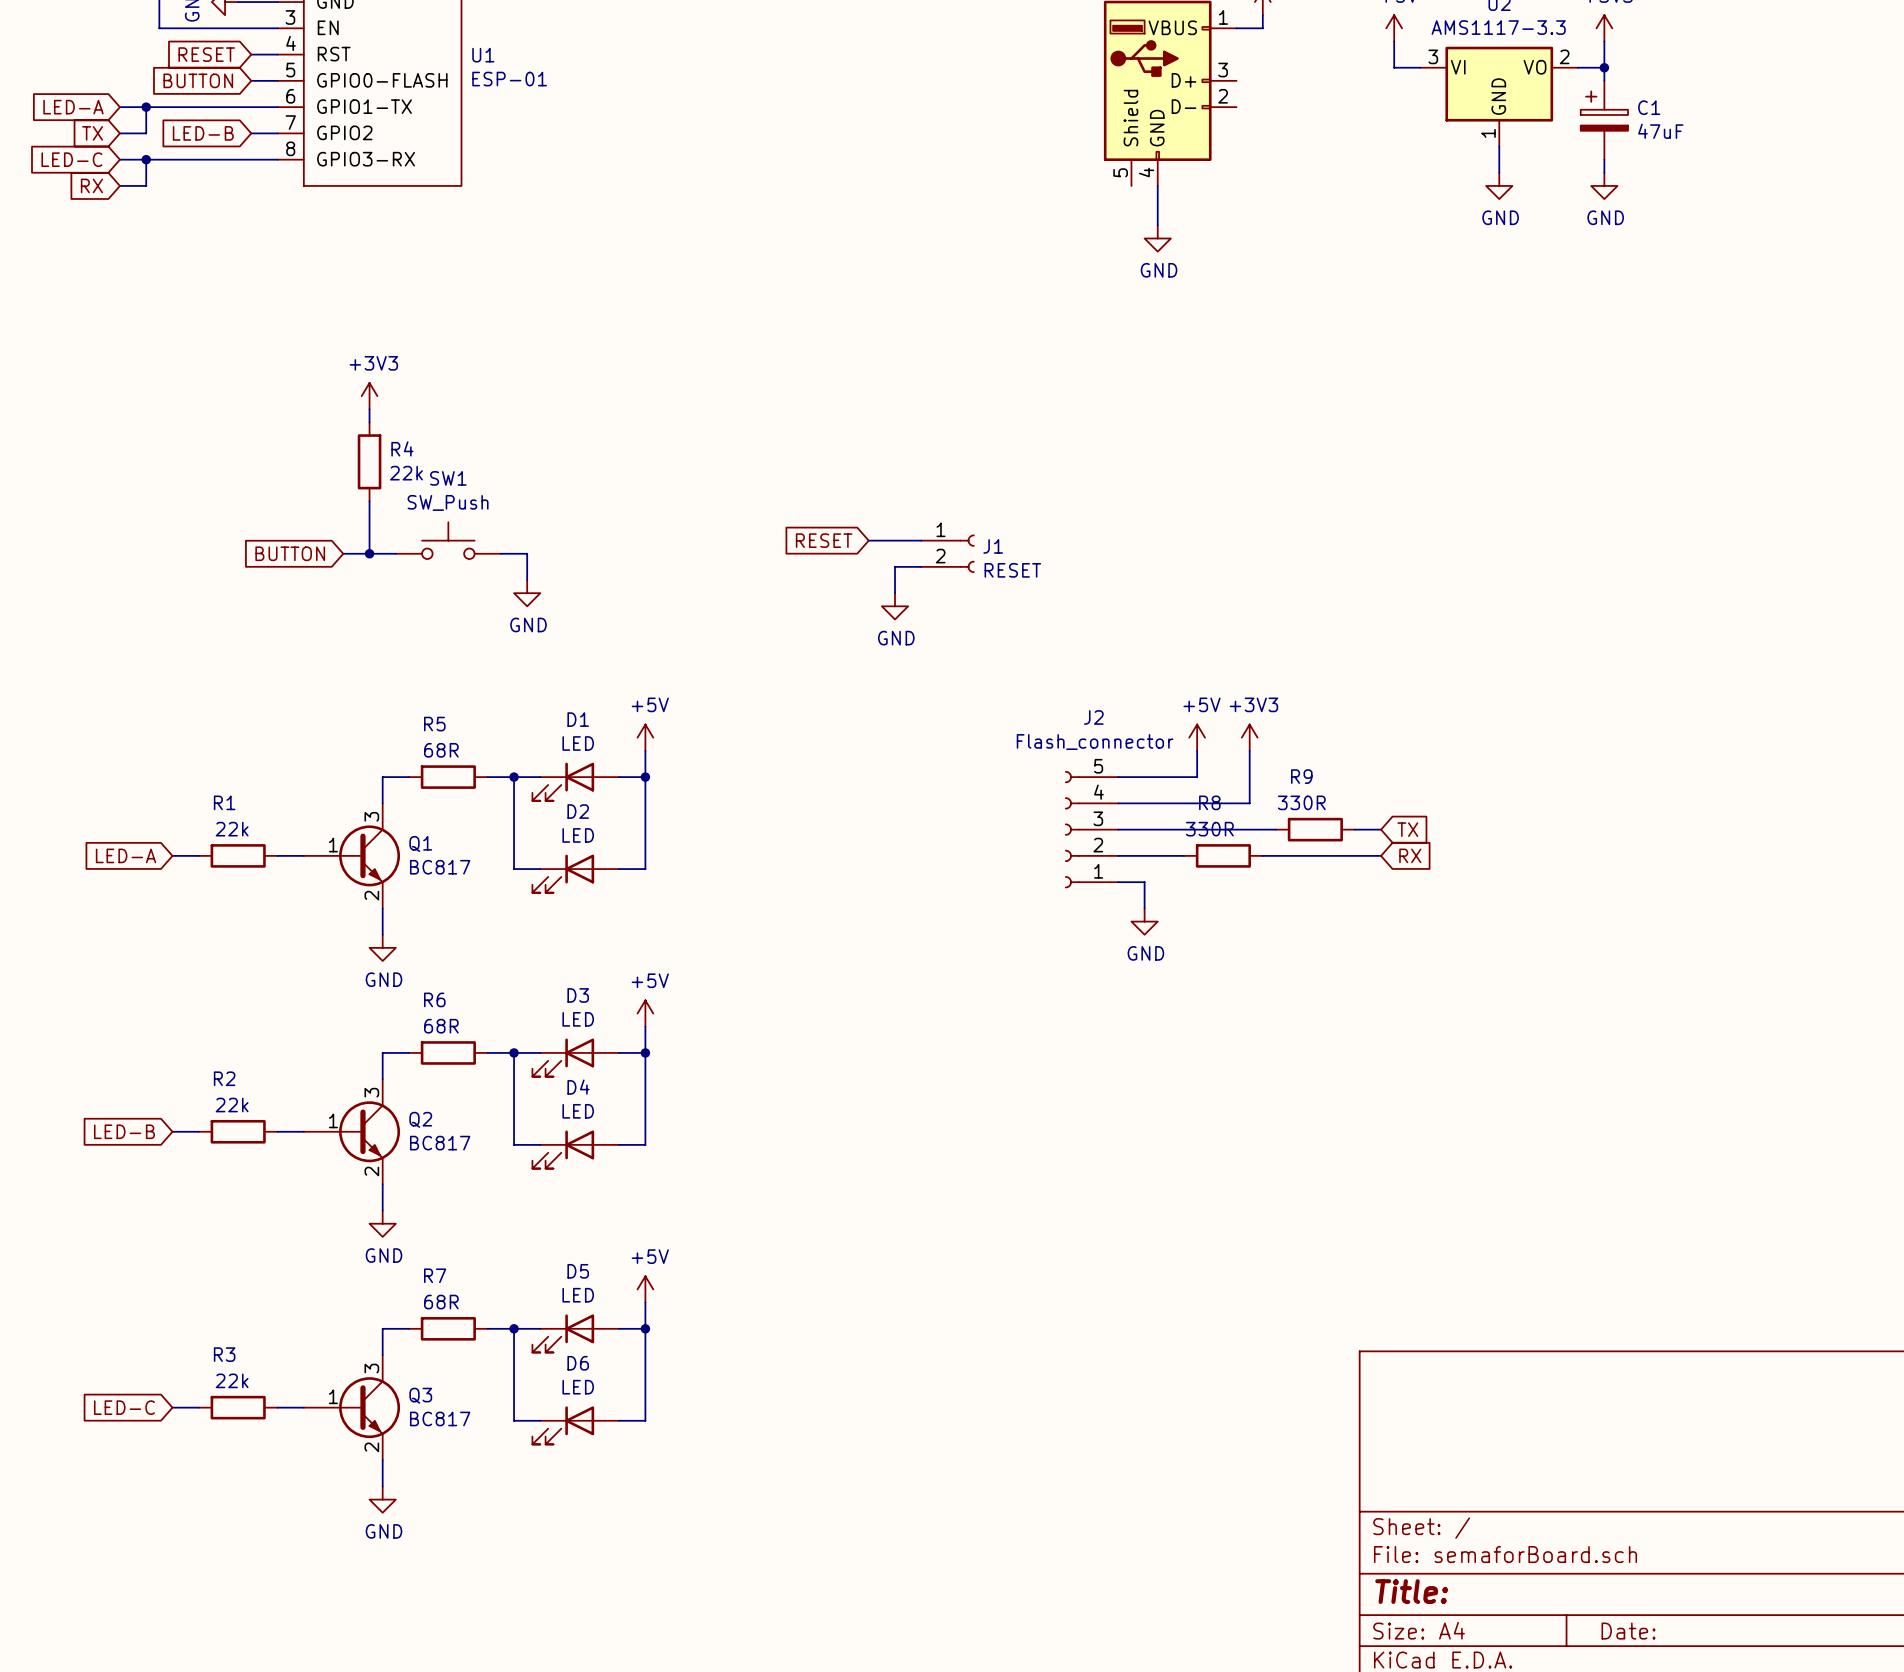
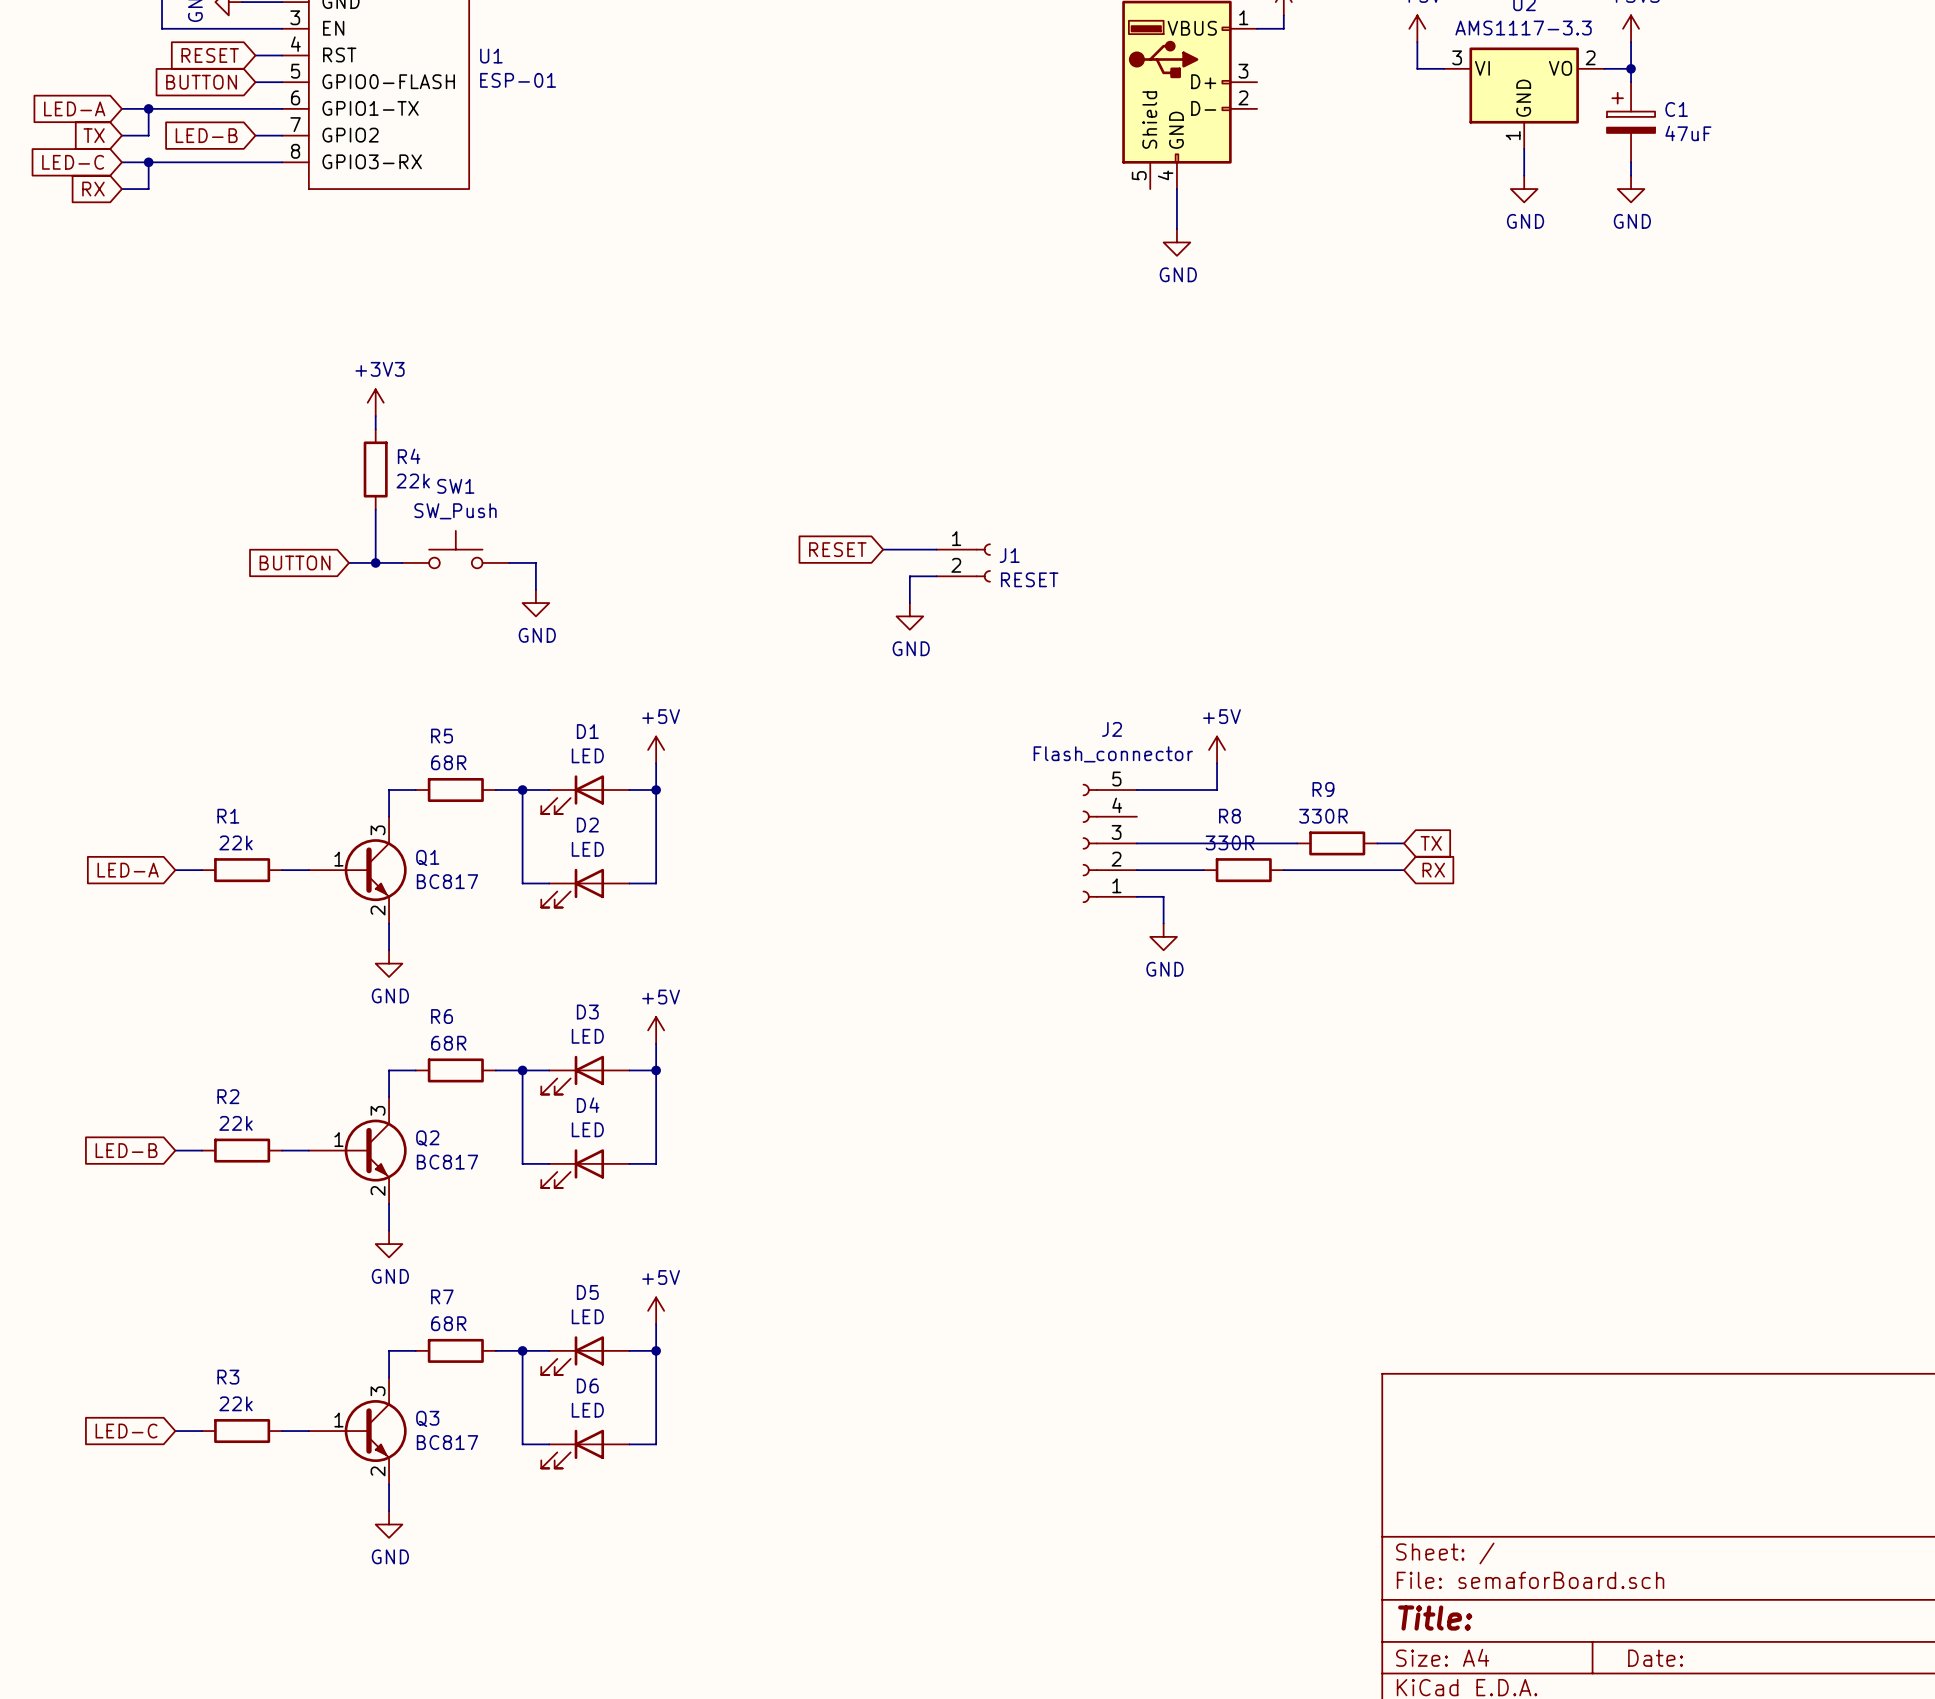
power symbol: +3V3 (1249, 737) -> none
wire: (1249, 750) (1249, 803) (1118, 803) -> none

